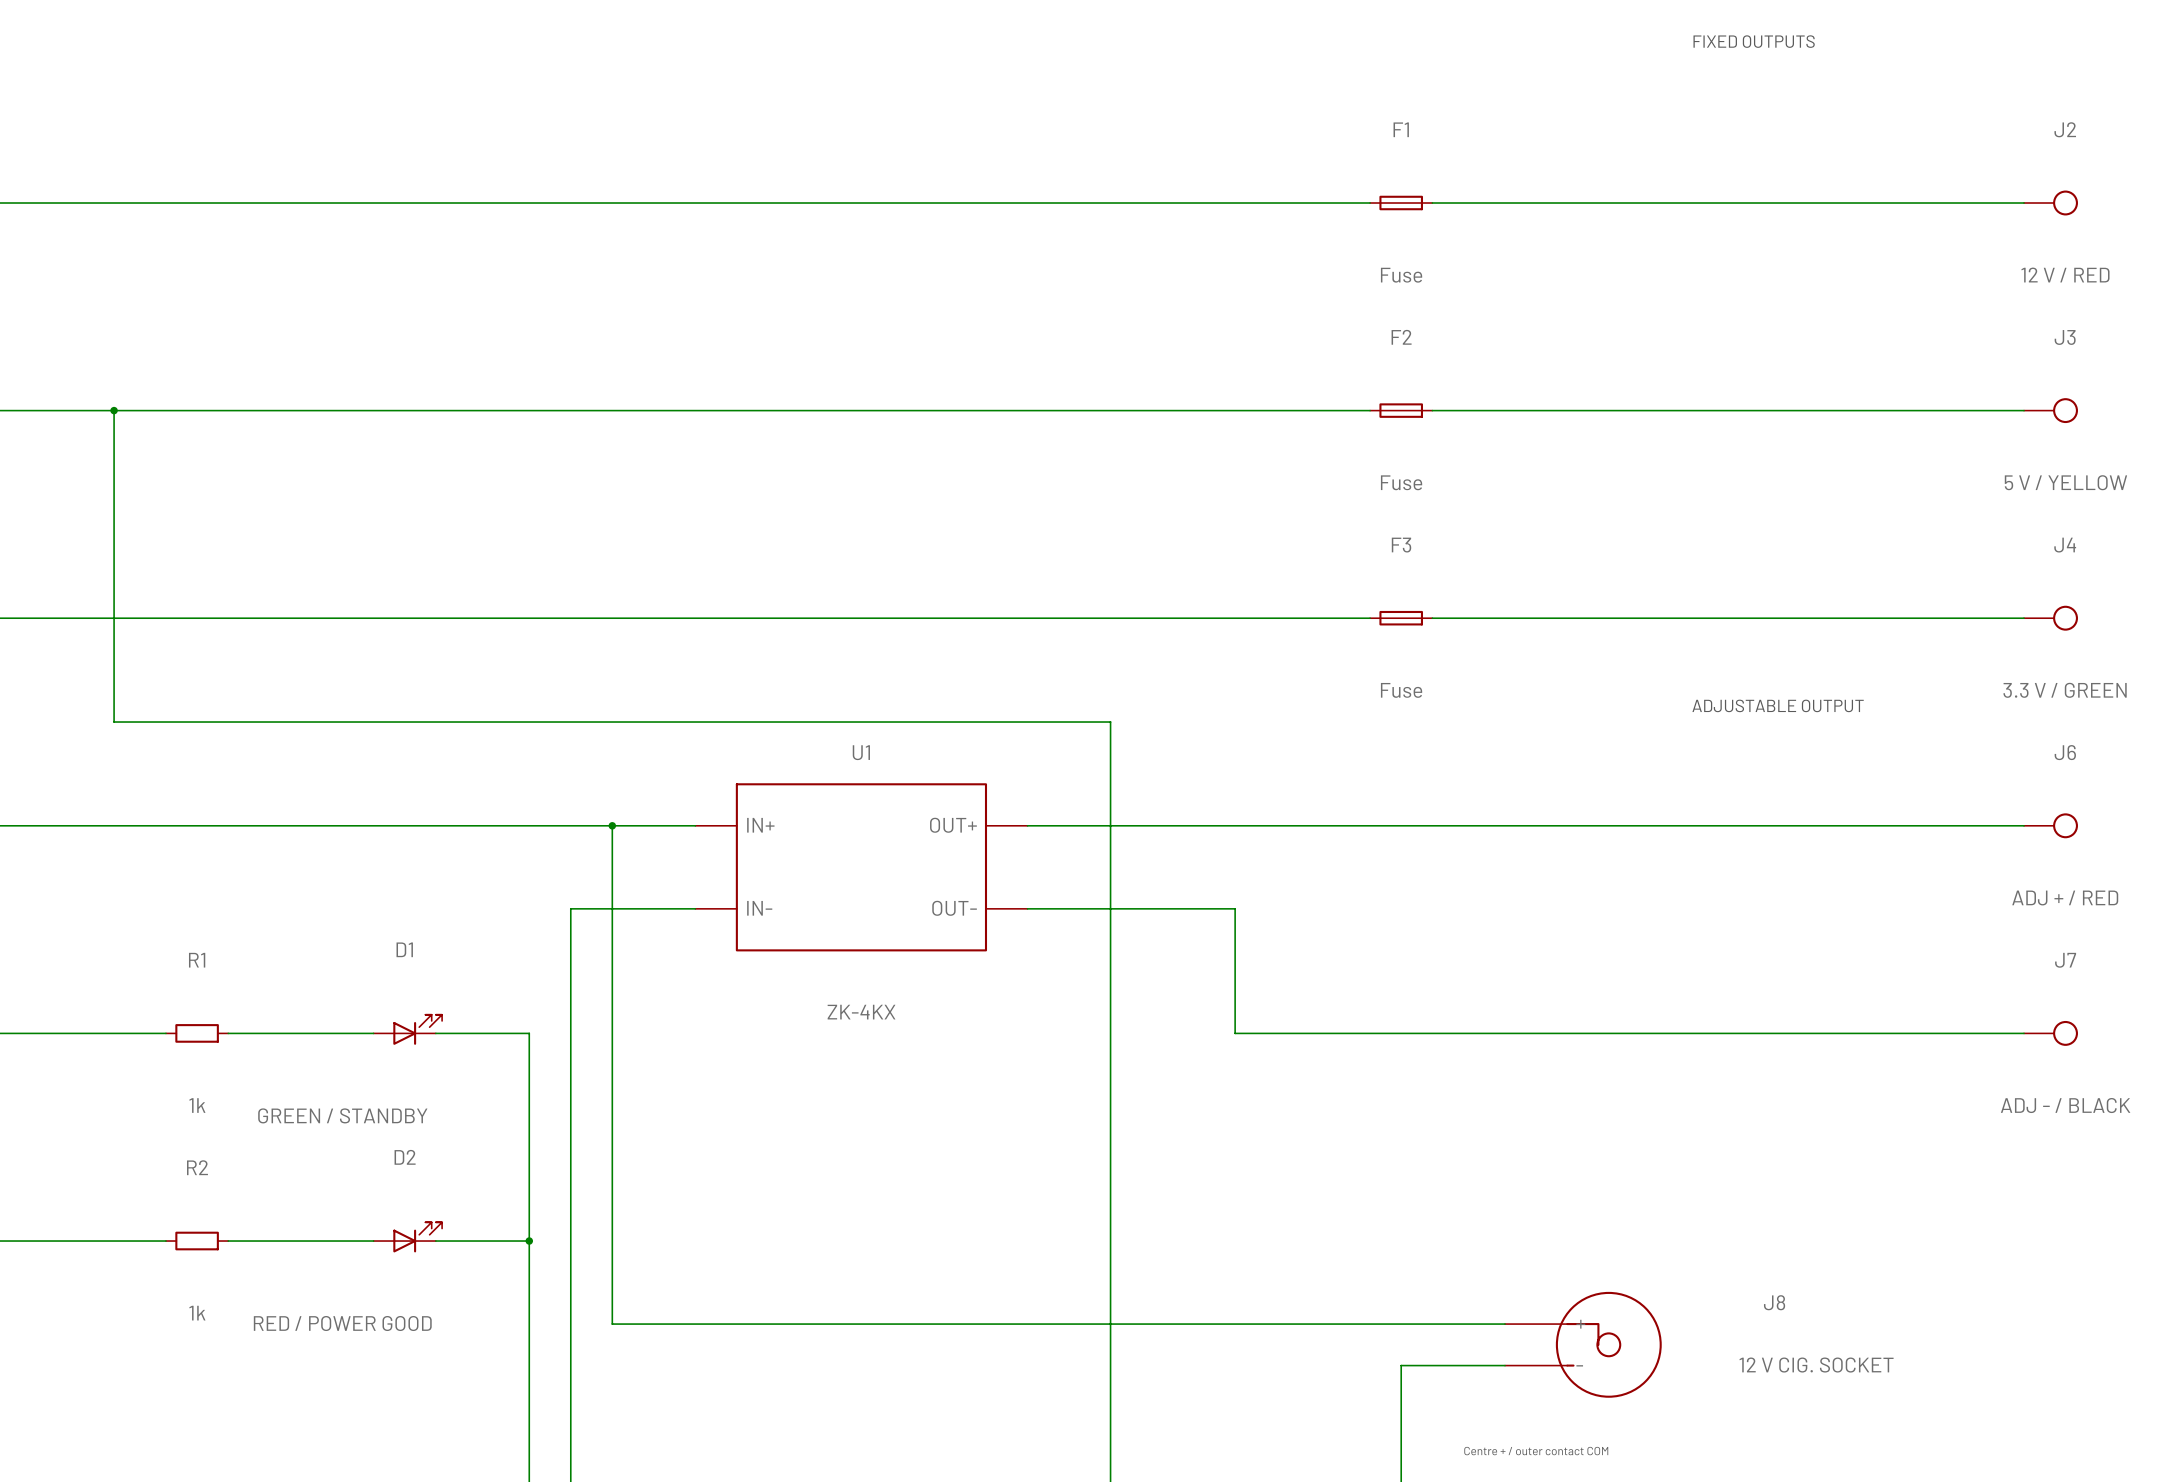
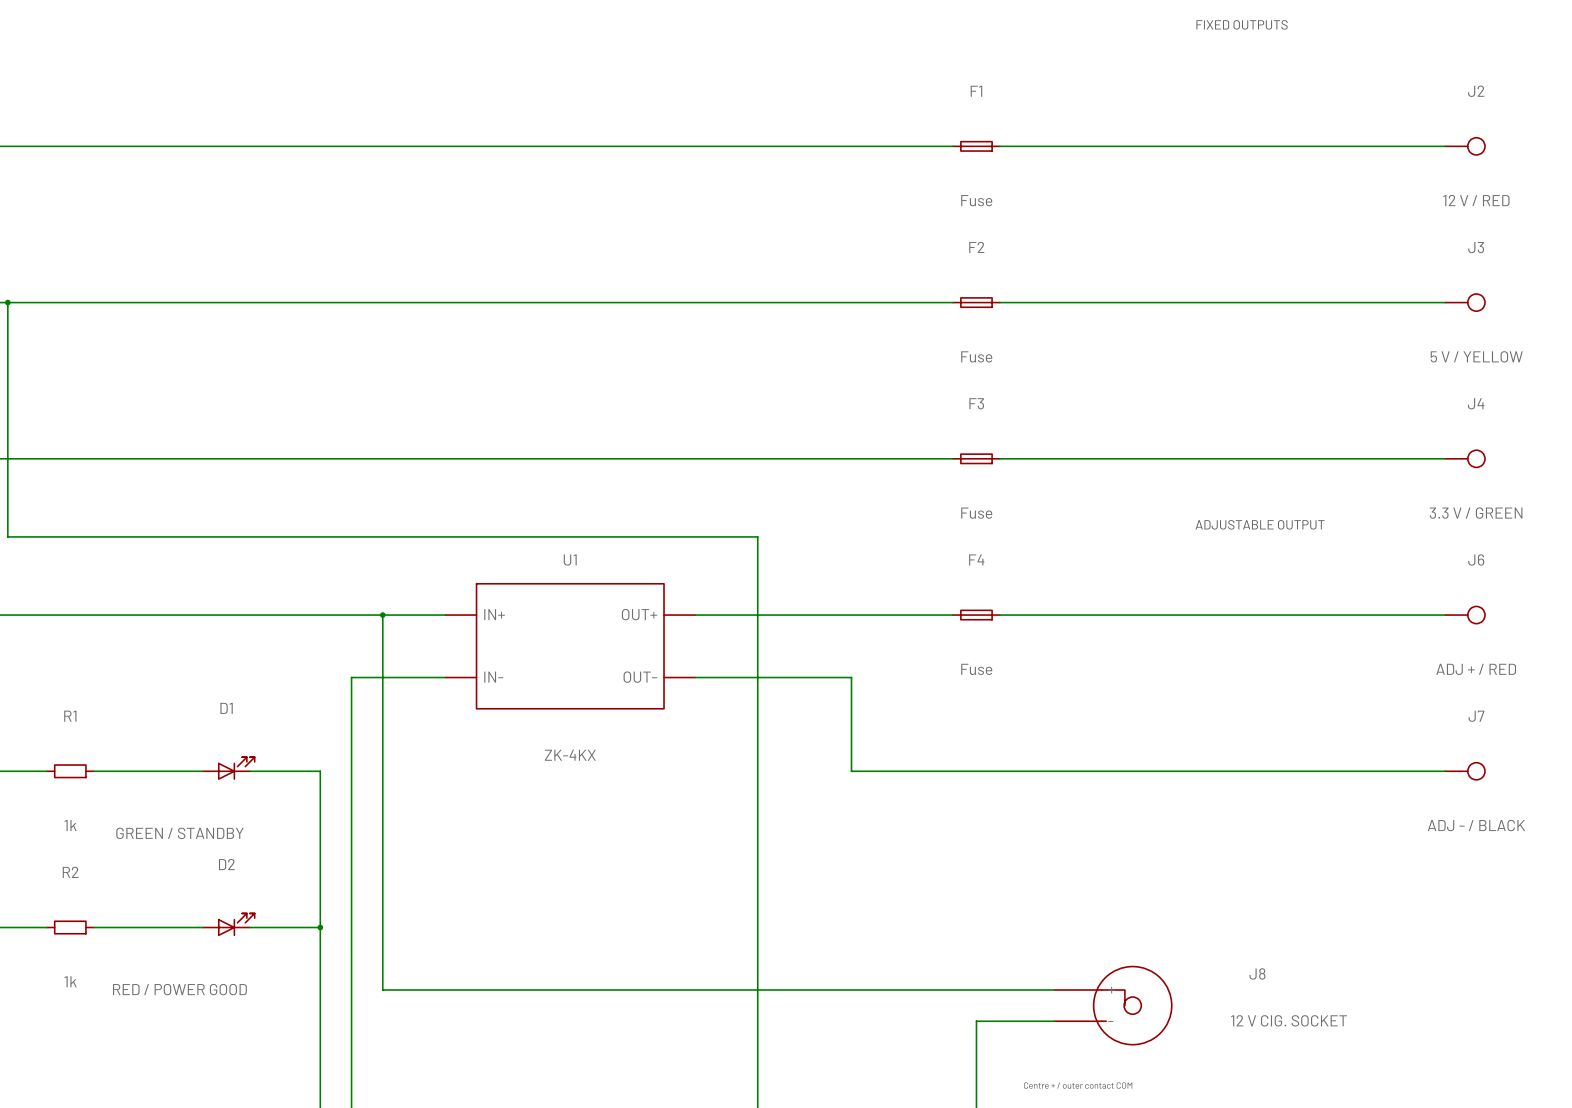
F4: none -> Fuse (976, 615)

